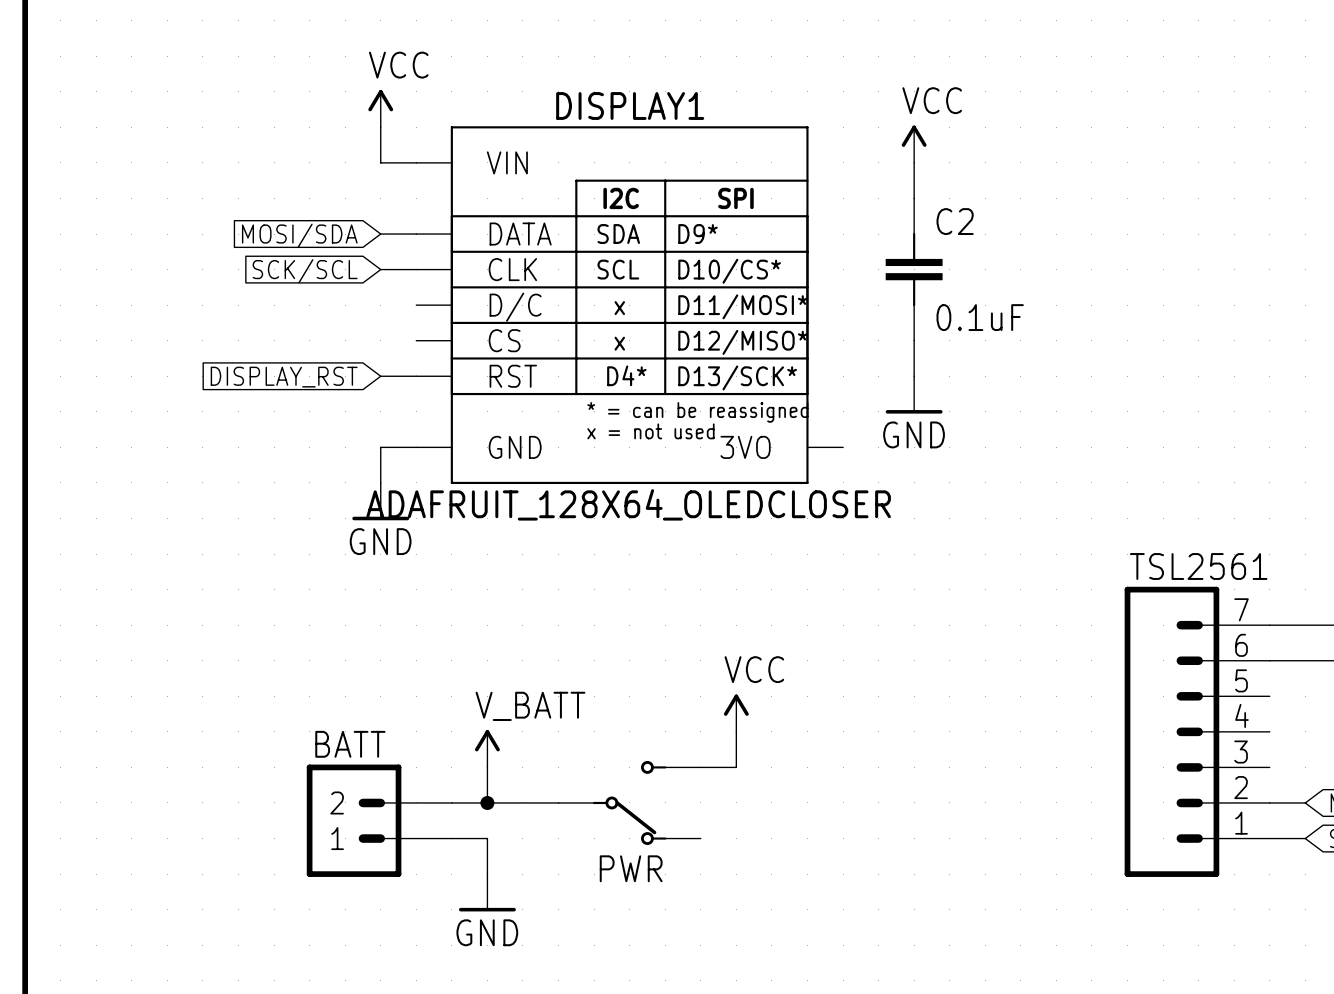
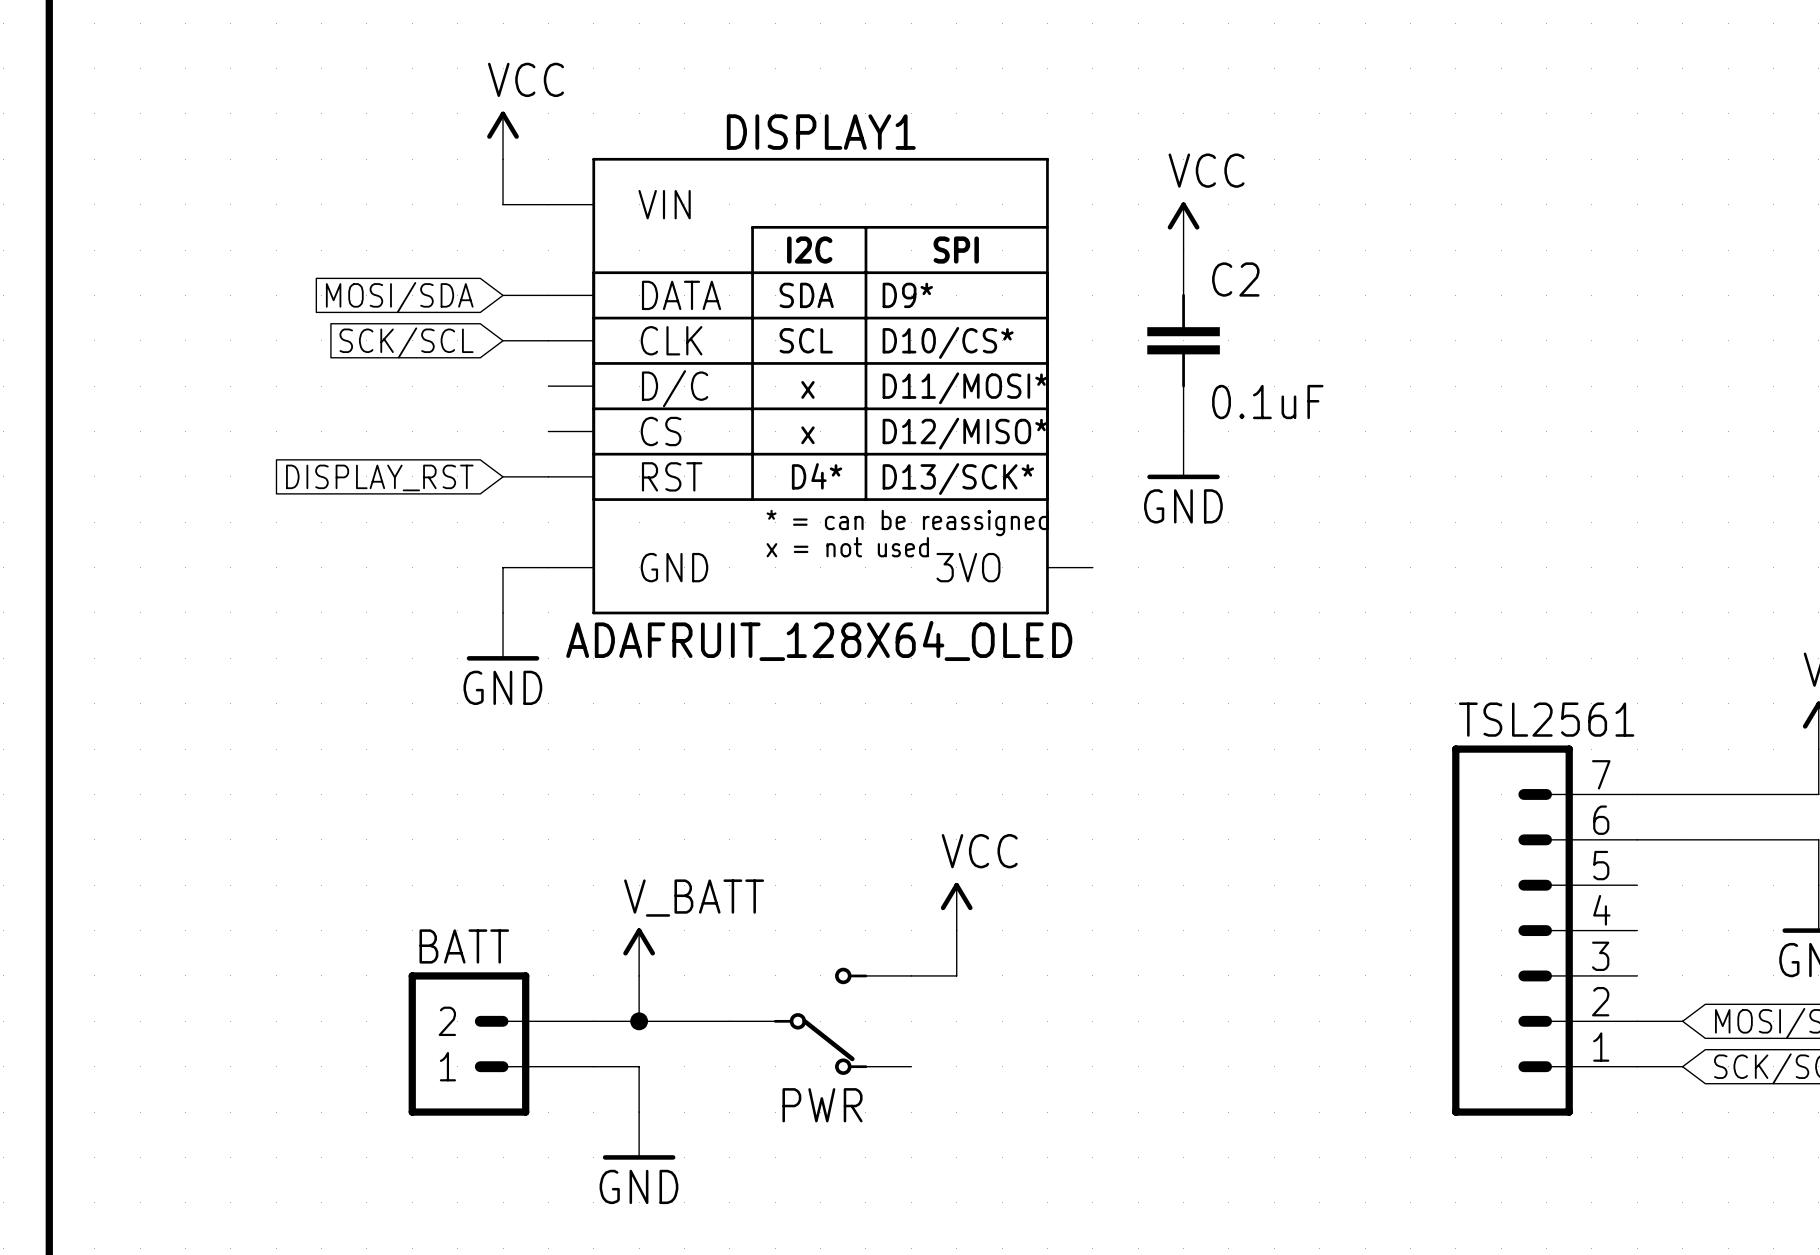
power symbol position: VCC (914, 144) -> VCC (1183, 226)
power symbol position: GND (914, 394) -> GND (1183, 455)
DISPLAY1 value: ADAFRUIT_128X64_OLEDCLOSER (628, 504) -> ADAFRUIT_128X64_OLED (819, 640)

